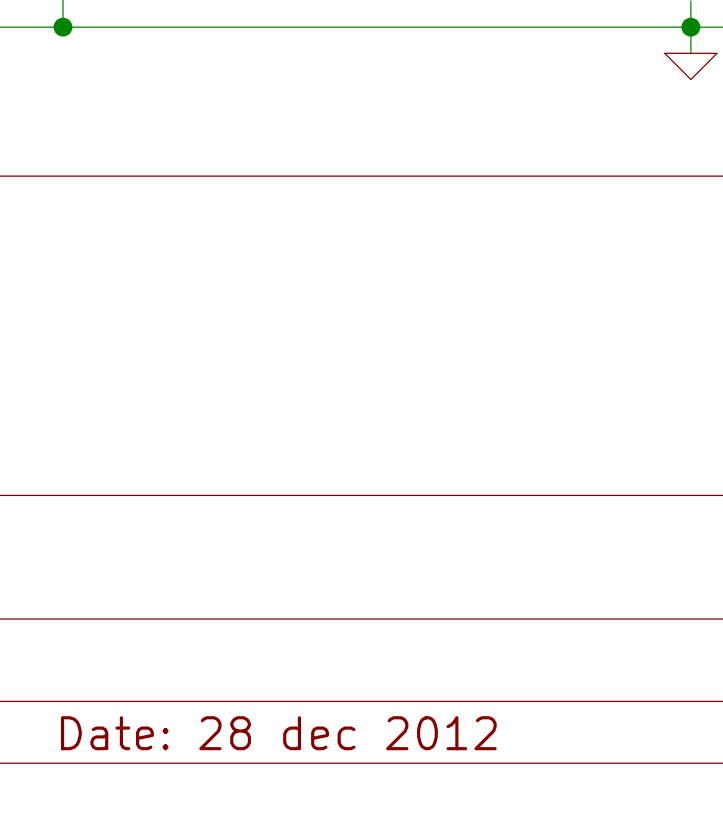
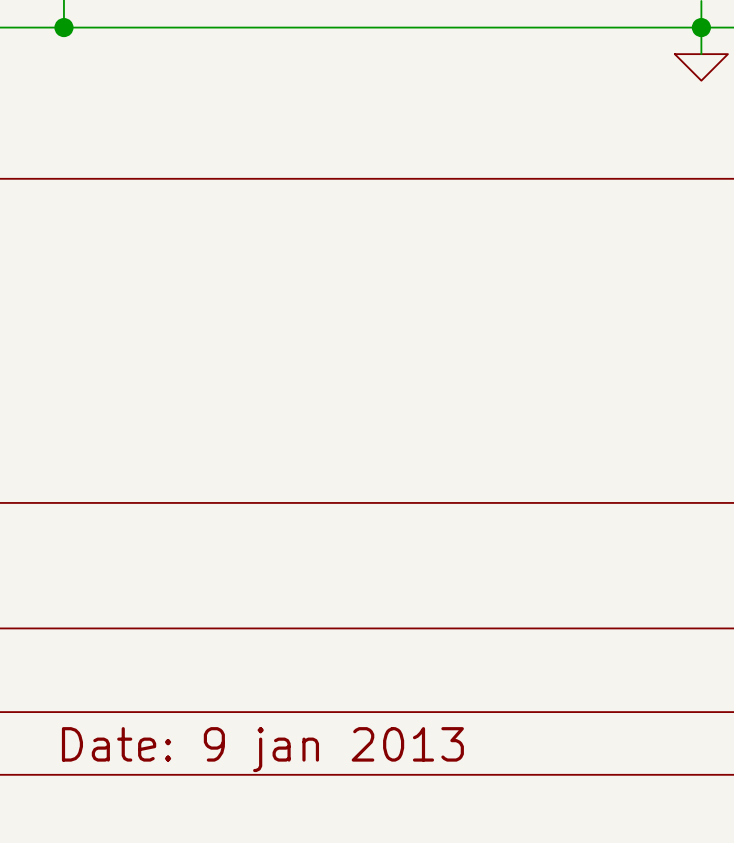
title block: Date: 28 dec 2012 (278, 733) -> Date: 9 jan 2013 (262, 749)

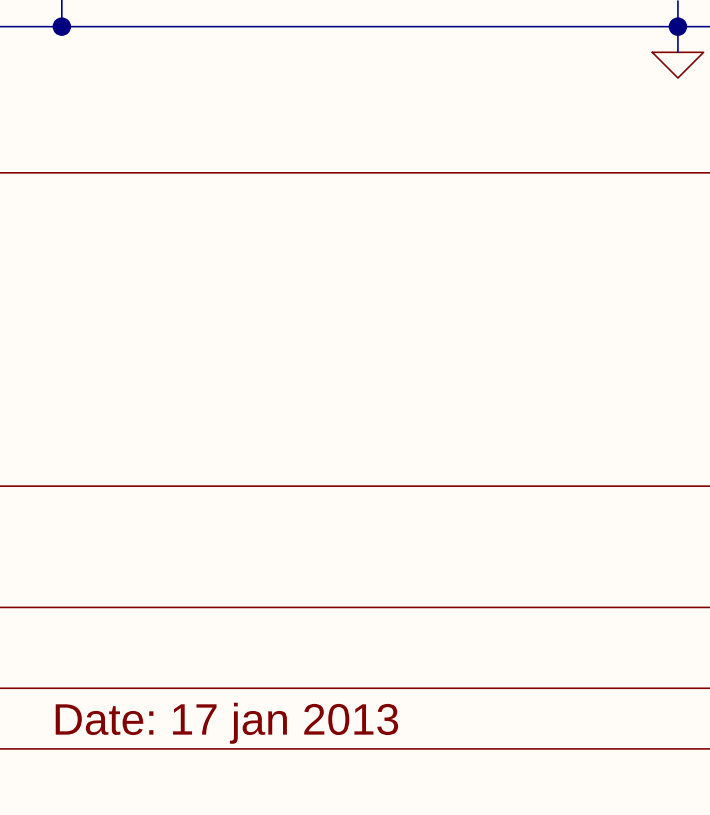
title block: Date: 9 jan 2013 (262, 749) -> Date: 17 jan 2013 (226, 723)

